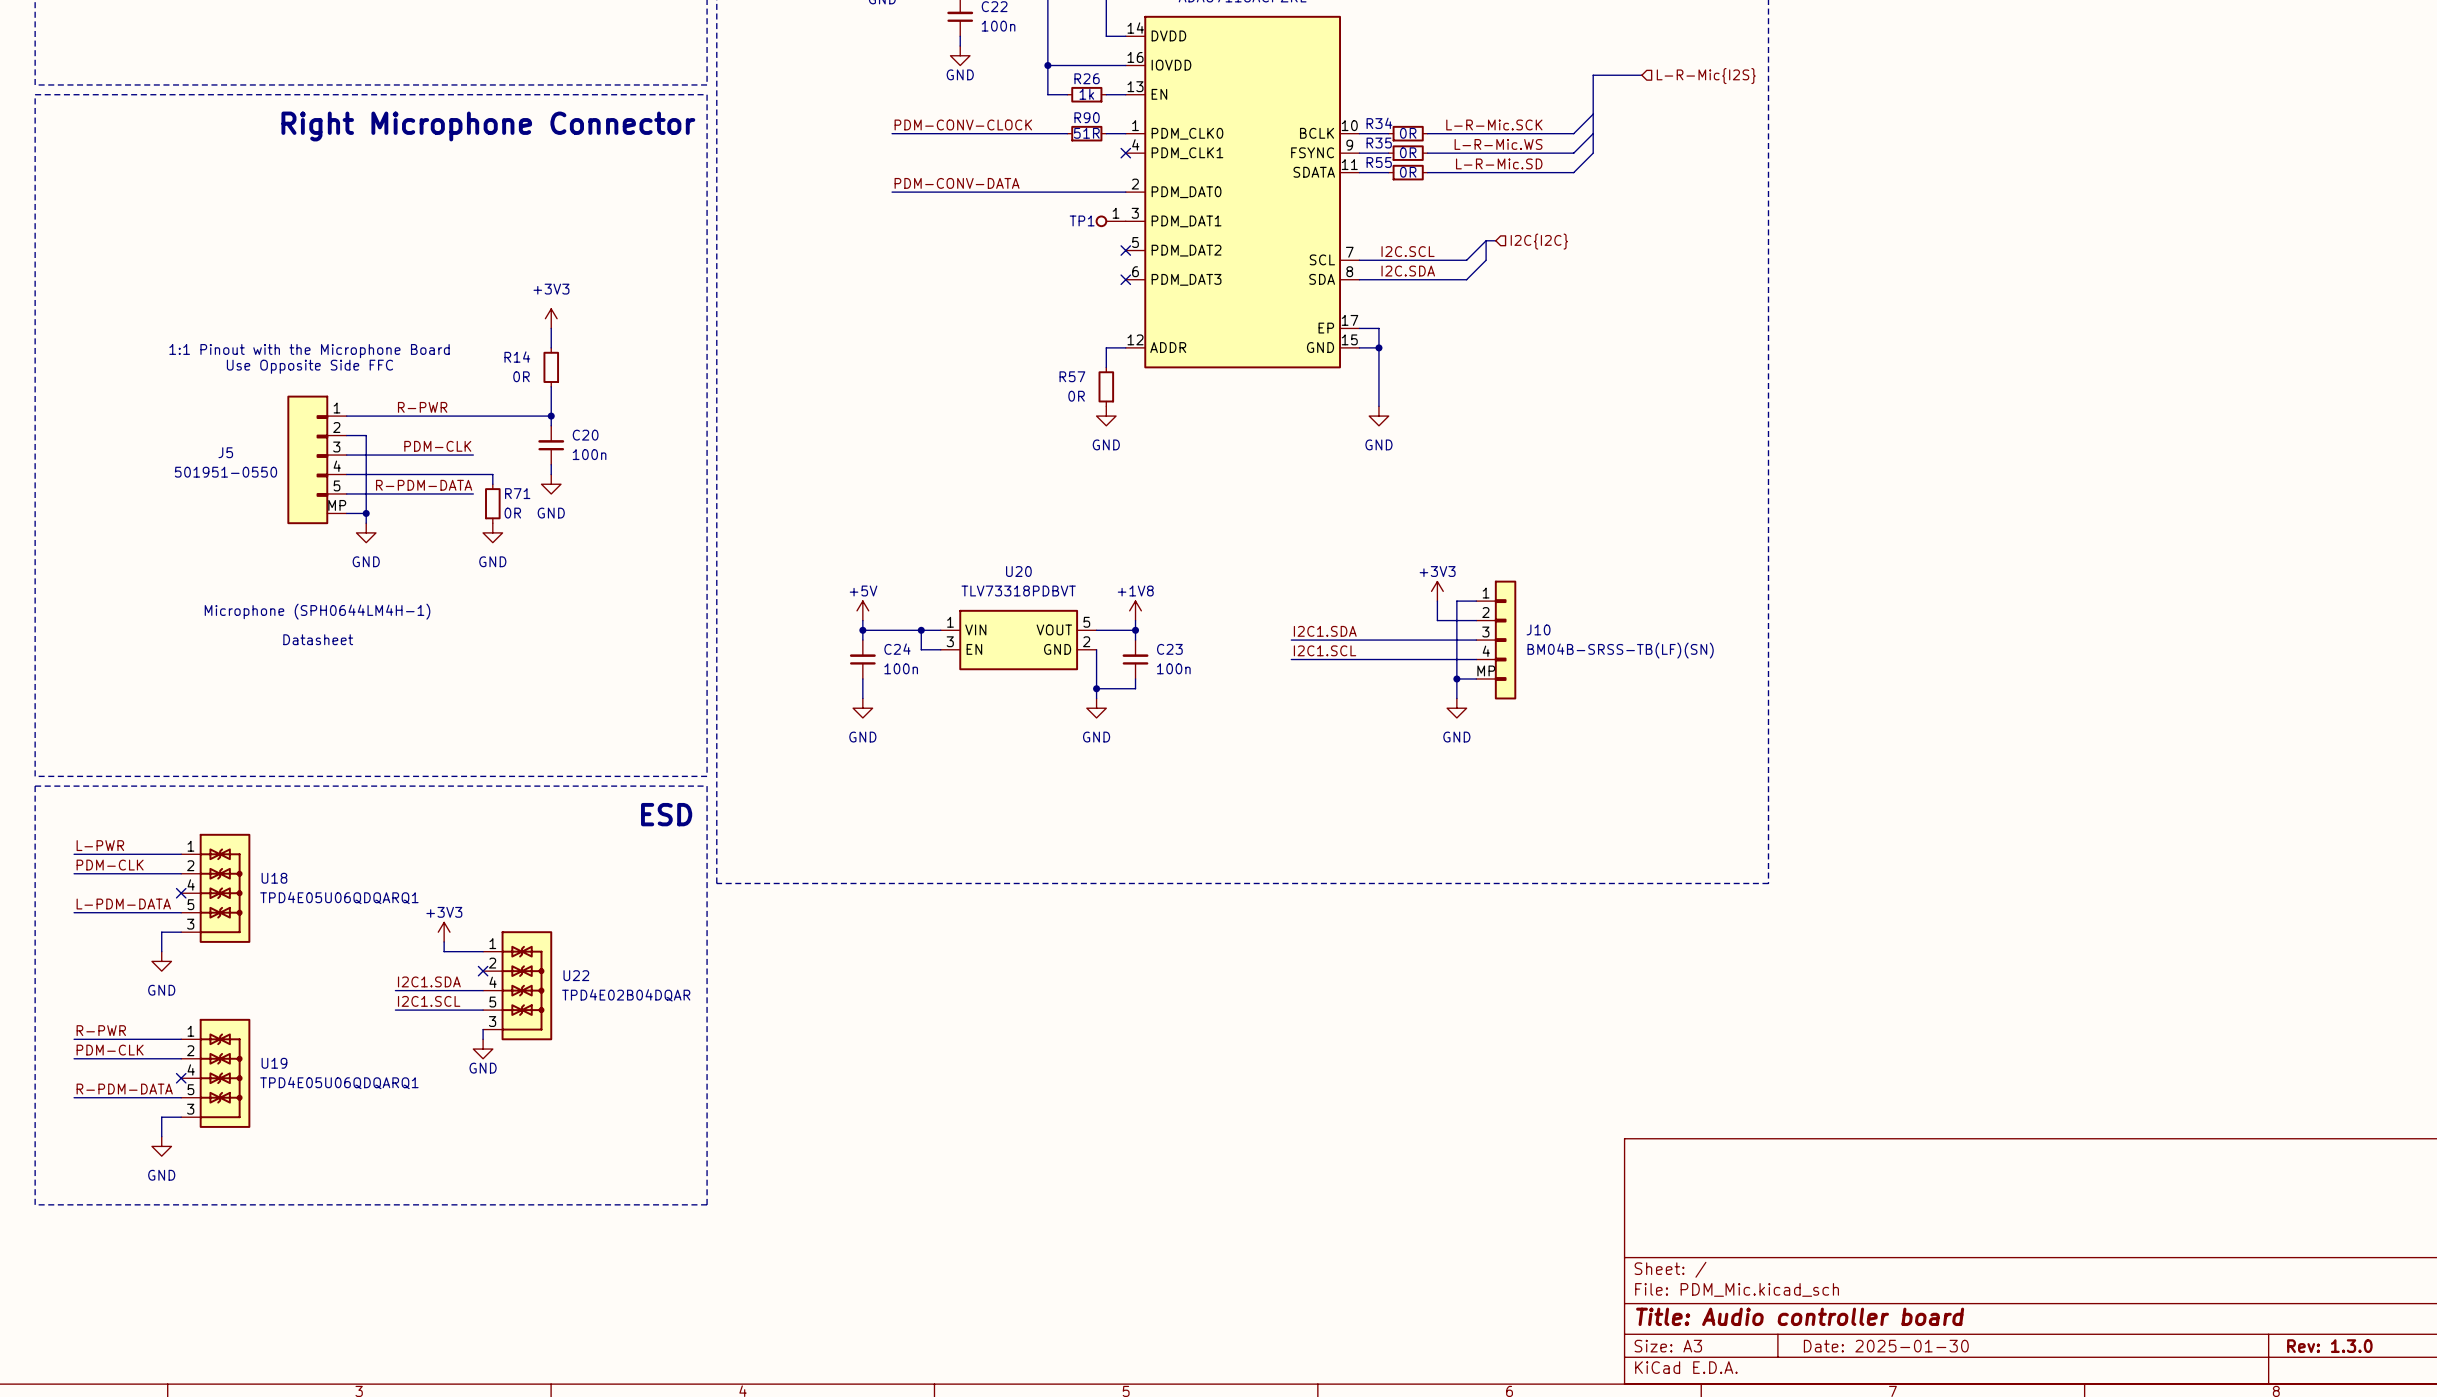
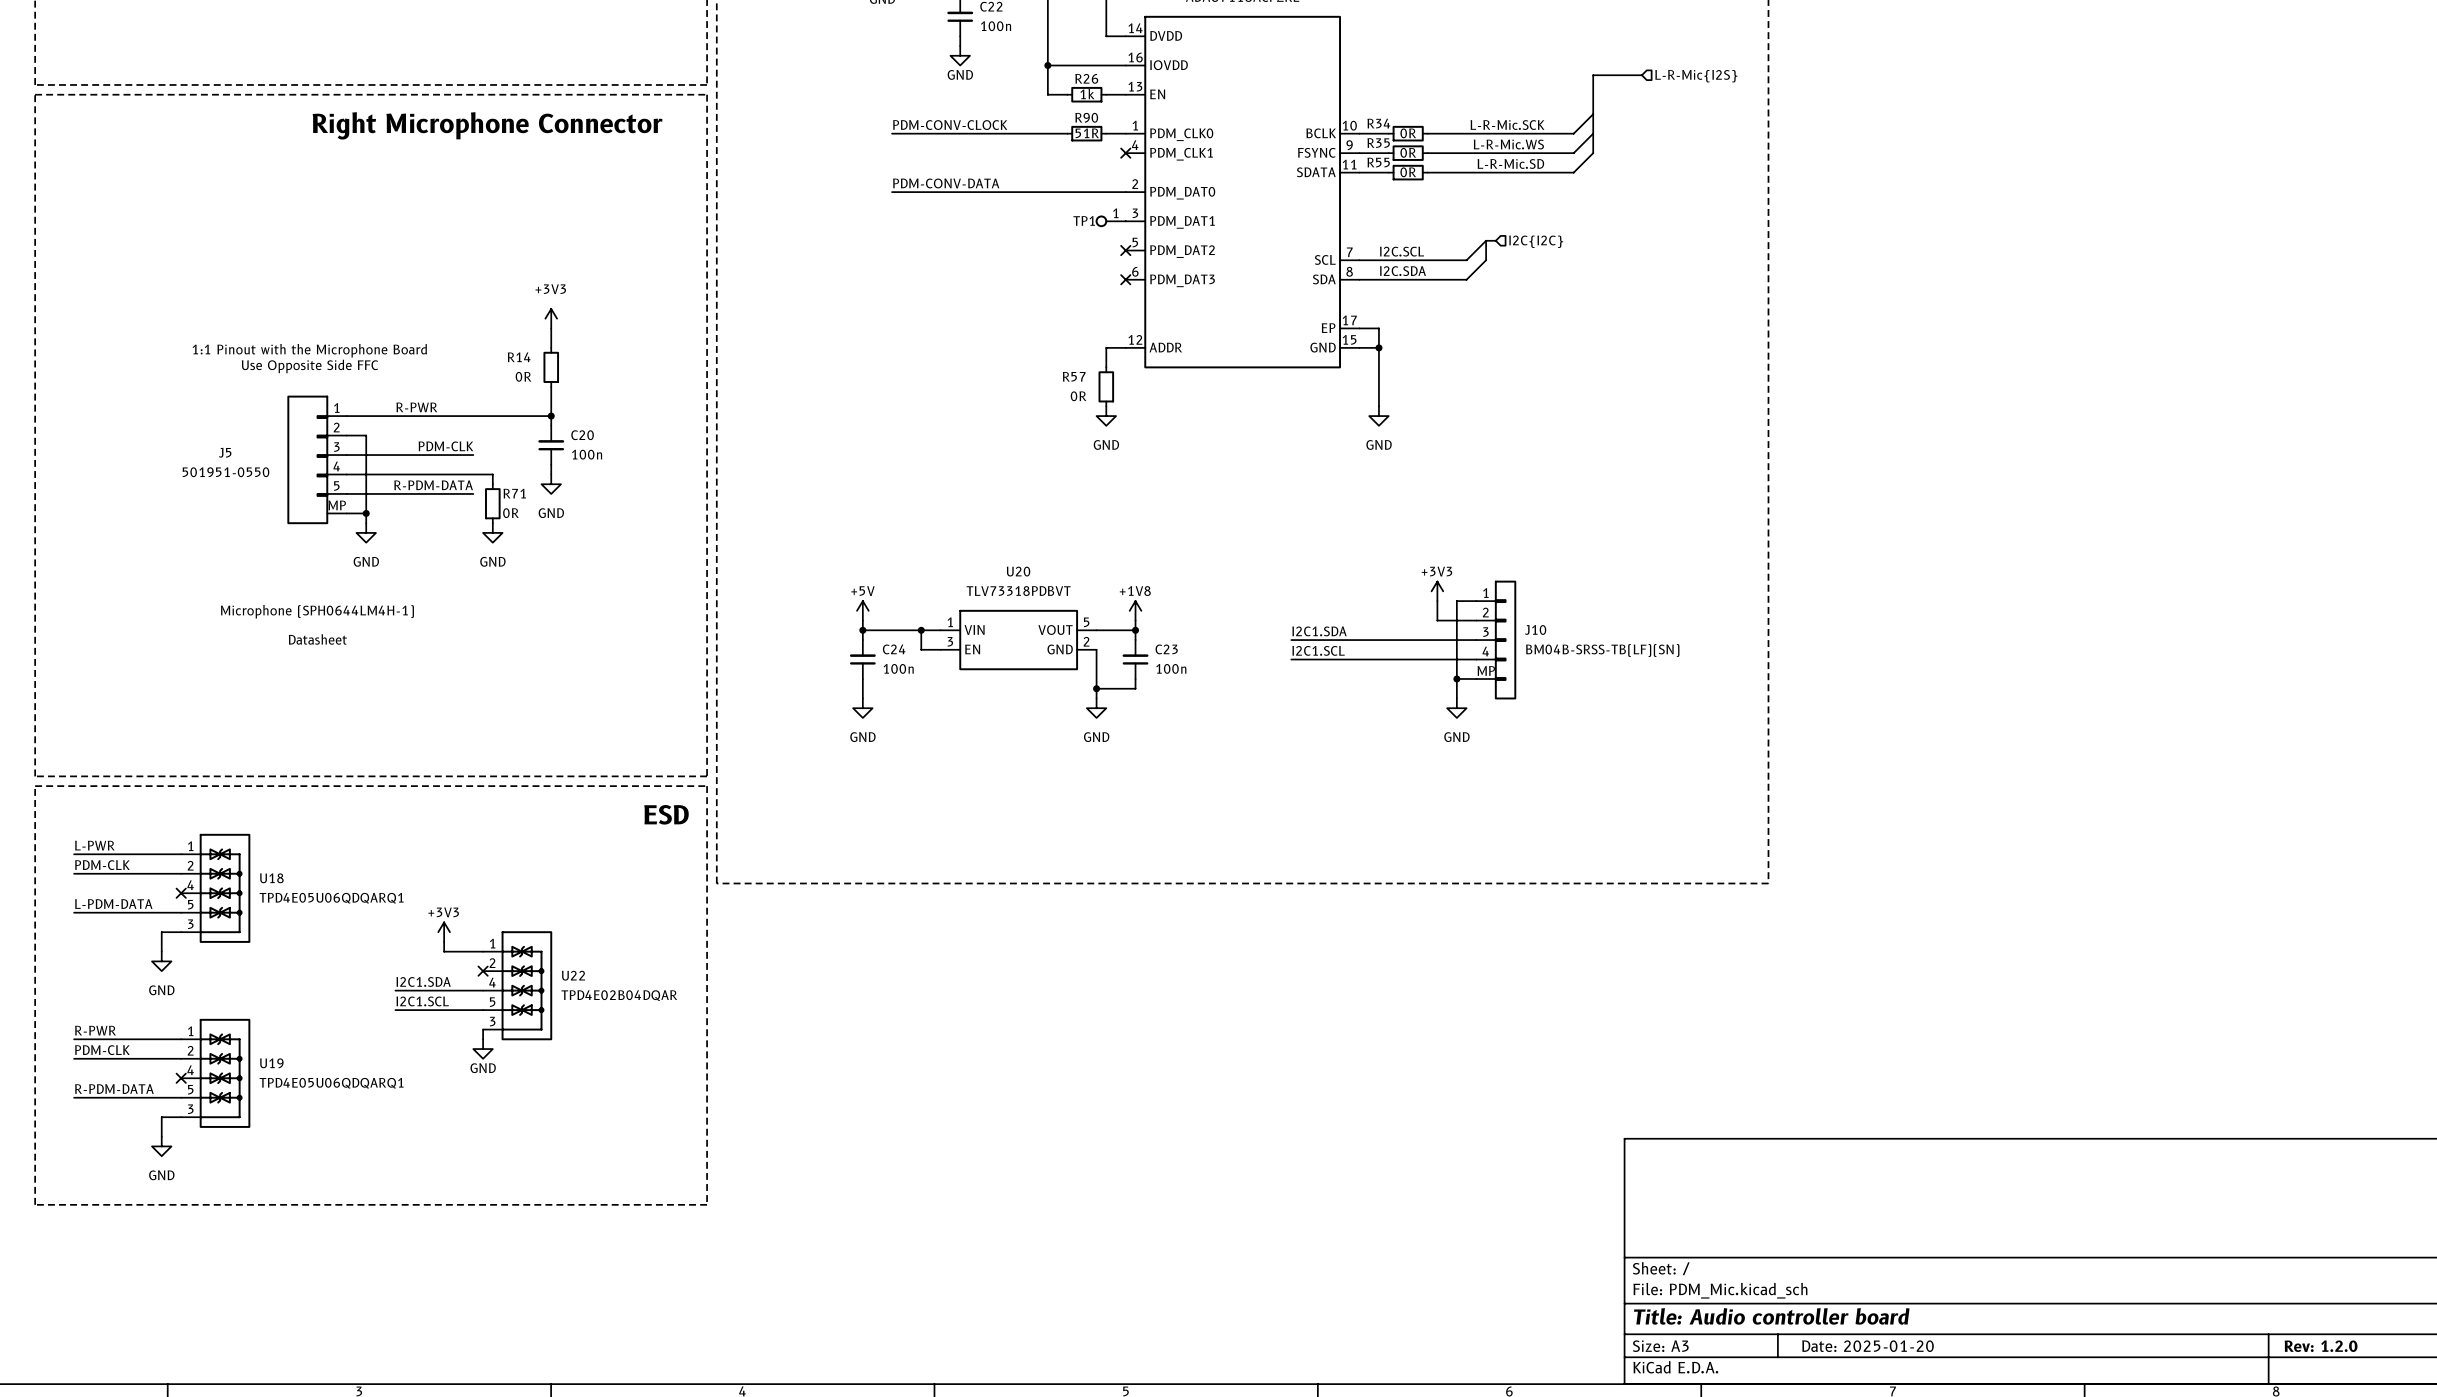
title block: Date: 2025-01-30 (1886, 1346) -> Date: 2025-01-20 (1868, 1346)
title block: Rev: 1.3.0 (2329, 1346) -> Rev: 1.2.0 (2321, 1346)

